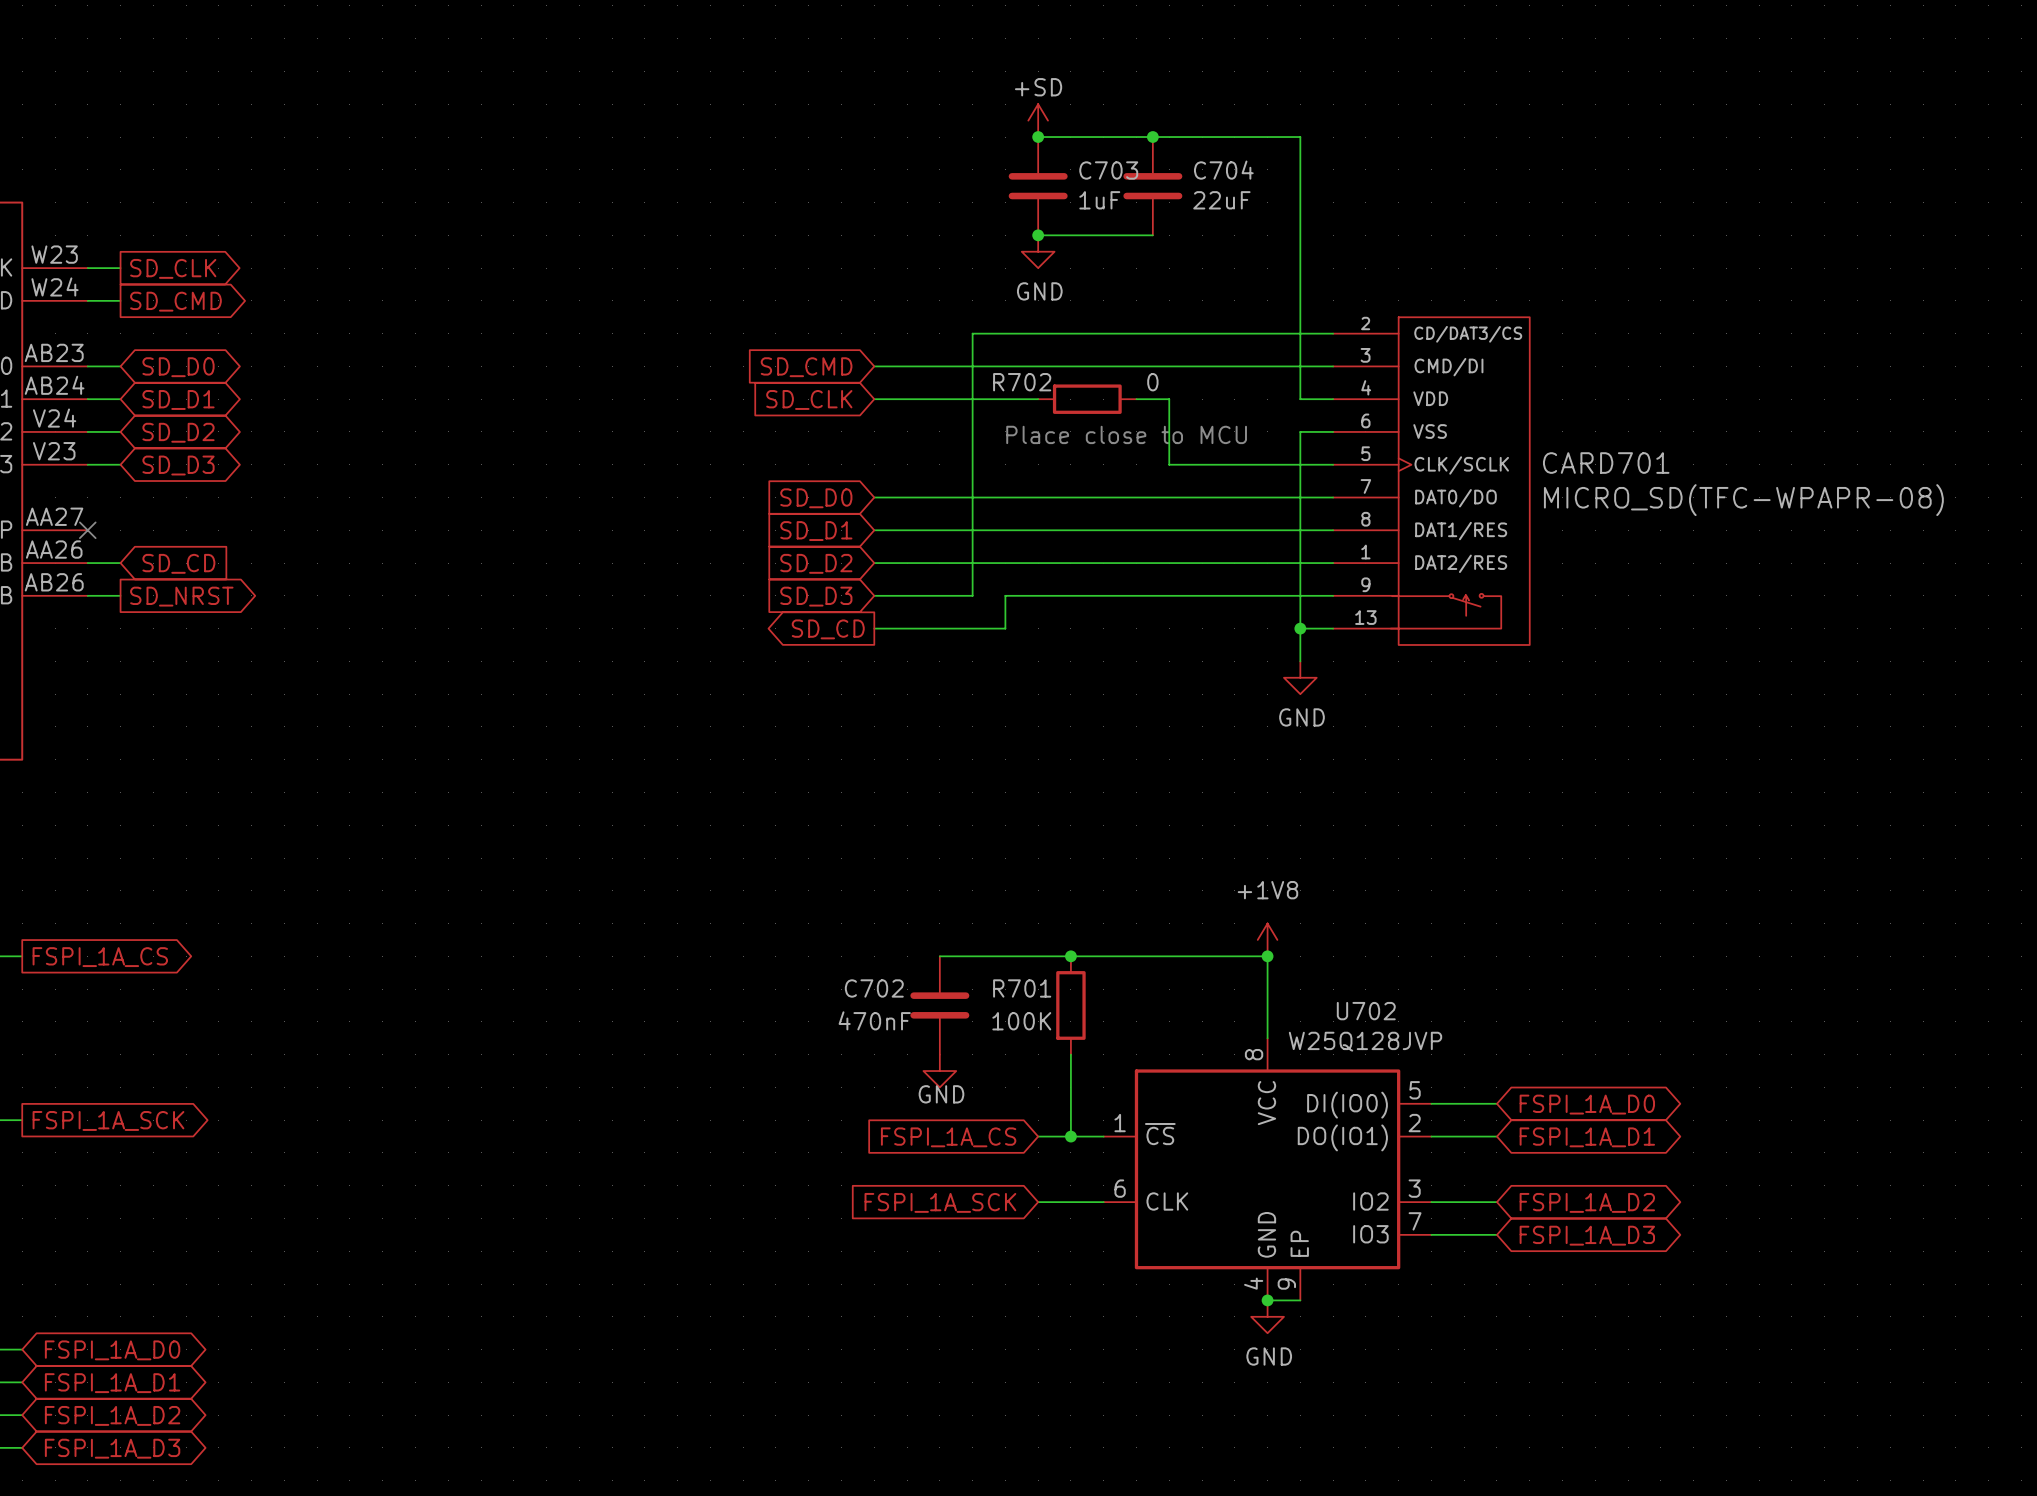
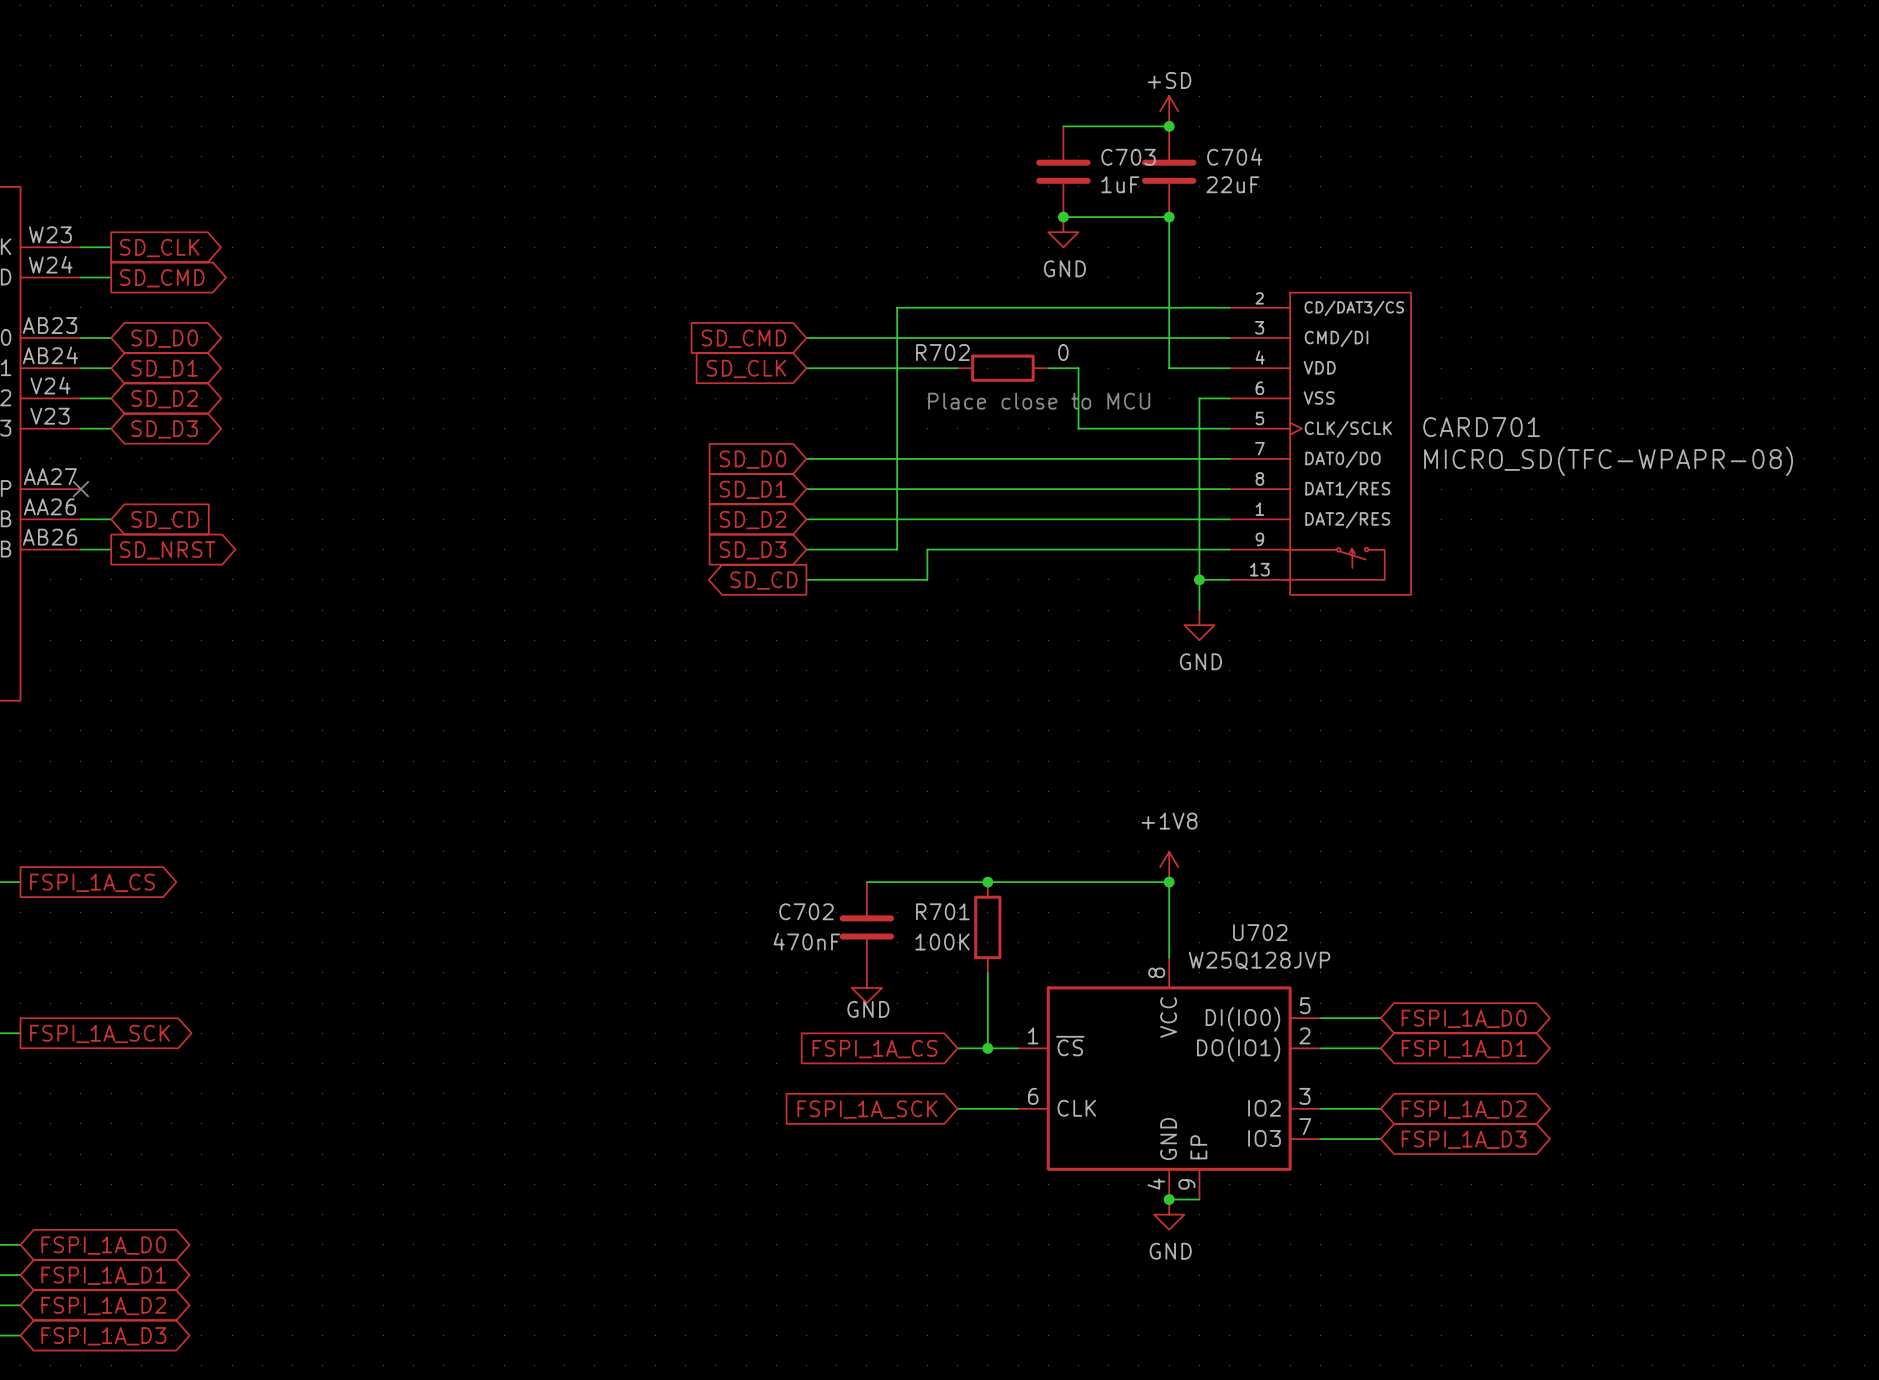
power symbol position: +SD (1038, 120) -> +SD (1169, 111)
wire: (1038, 137) (1152, 137) -> none
junction: (1038, 137) -> none
junction: (1152, 137) -> none
wire: (1267, 137) (1300, 137) (1300, 399) -> (1063, 217) (1169, 217) (1169, 368) (1199, 368)
junction: none -> (1169, 126)
C704 name: C704 (1223, 170) -> C703 (1128, 157)
C703: 1uF (1038, 186) -> none
C704: none -> 22uF (1169, 171)
C704 value: 22uF (1221, 200) -> 1uF (1120, 184)
wire: (1038, 235) (1152, 235) -> none
junction: (1038, 235) -> none
junction: none -> (1063, 217)
junction: none -> (1169, 217)
power symbol position: GND (1038, 251) -> GND (1063, 232)

